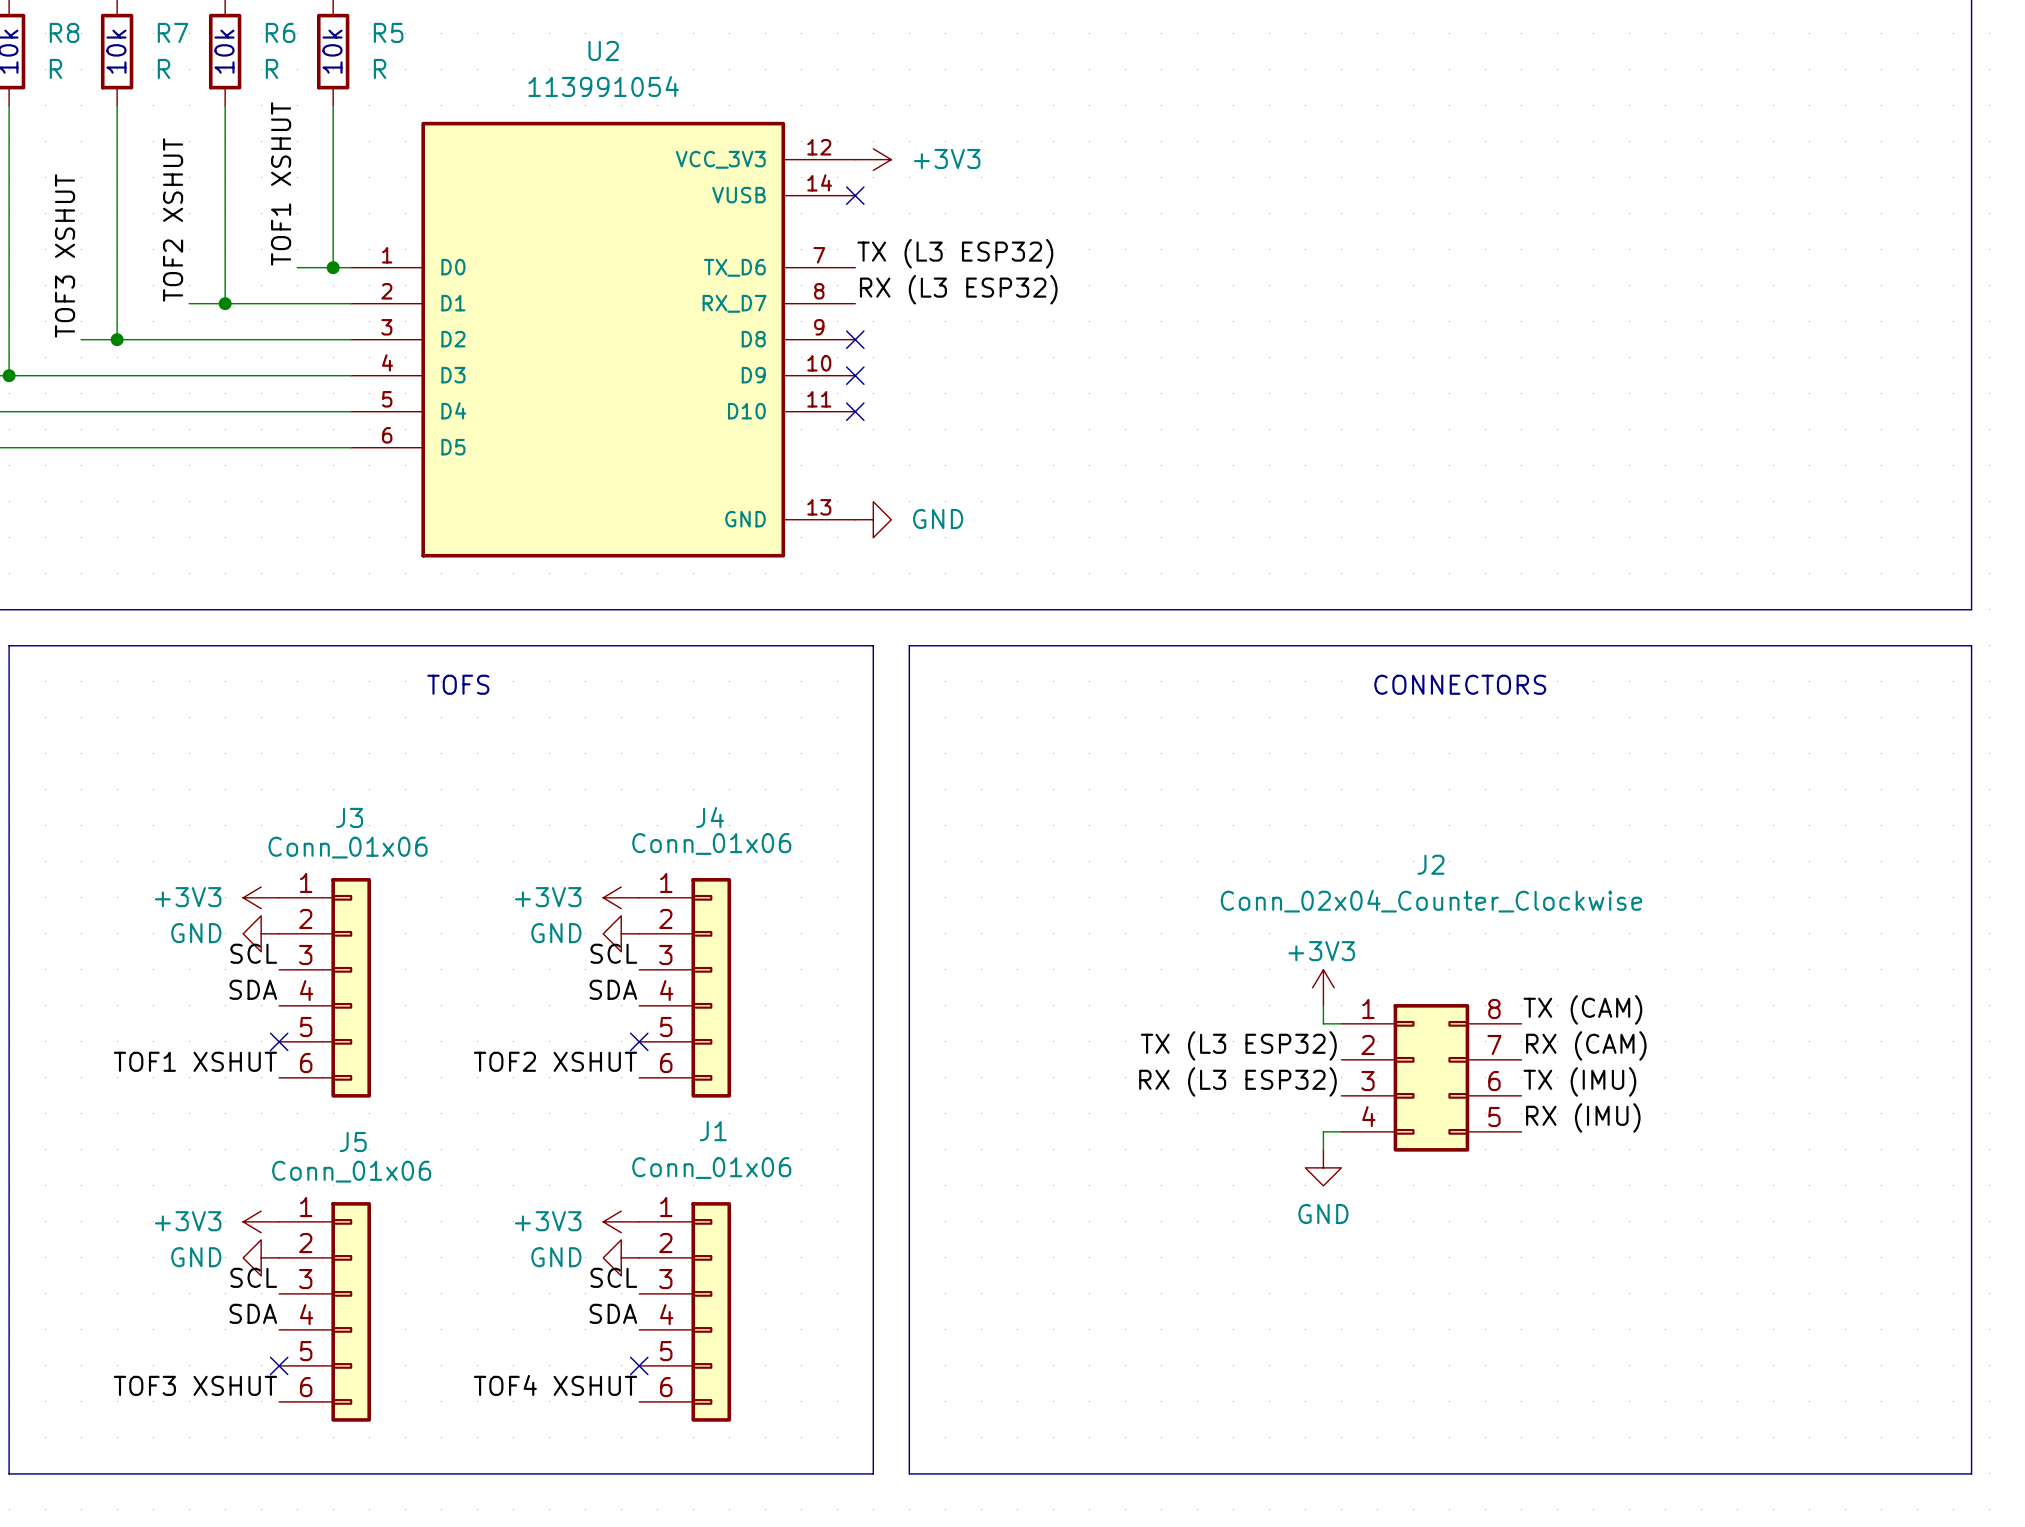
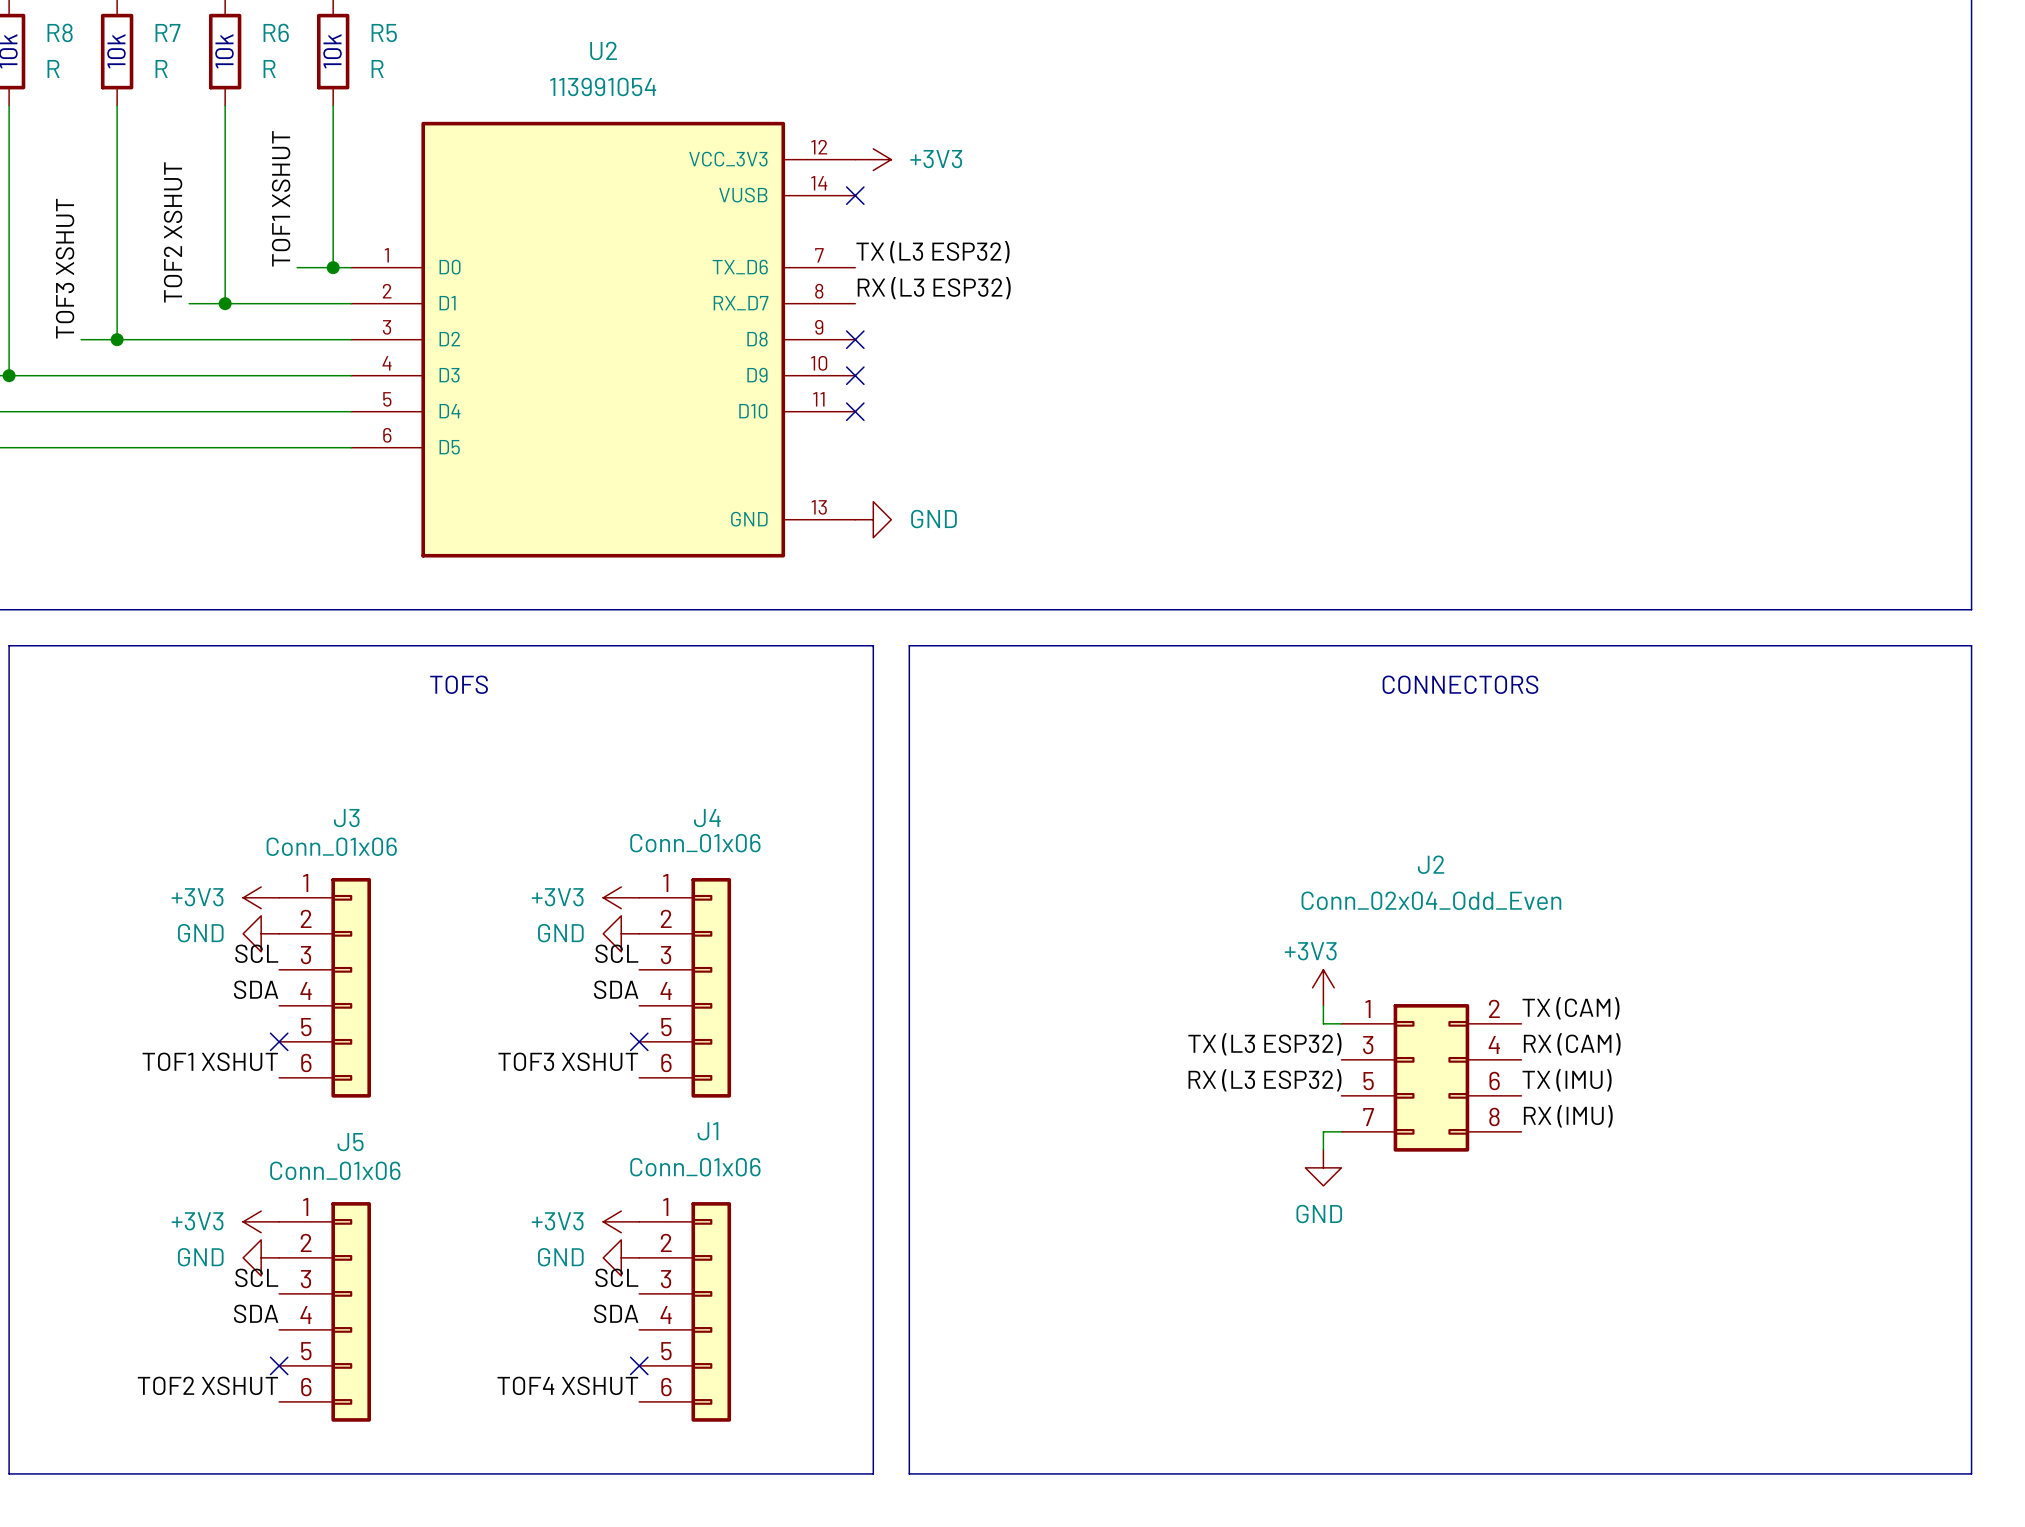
J2 value: Conn_02x04_Counter_Clockwise (1431, 901) -> Conn_02x04_Odd_Even (1431, 900)
J2 pin number: 8 (1494, 1008) -> 2 (1494, 1008)
J2 pin number: 2 (1367, 1045) -> 3 (1368, 1045)
J2 pin number: 7 (1494, 1045) -> 4 (1494, 1045)
label: TOF2 XSHUT (555, 1061) -> TOF3 XSHUT (568, 1061)
J2 pin number: 3 (1367, 1081) -> 5 (1368, 1081)
J2 pin number: 4 (1368, 1116) -> 7 (1368, 1117)
J2 pin number: 5 (1494, 1117) -> 8 (1494, 1116)
label: TOF3 XSHUT (195, 1385) -> TOF2 XSHUT (207, 1385)

